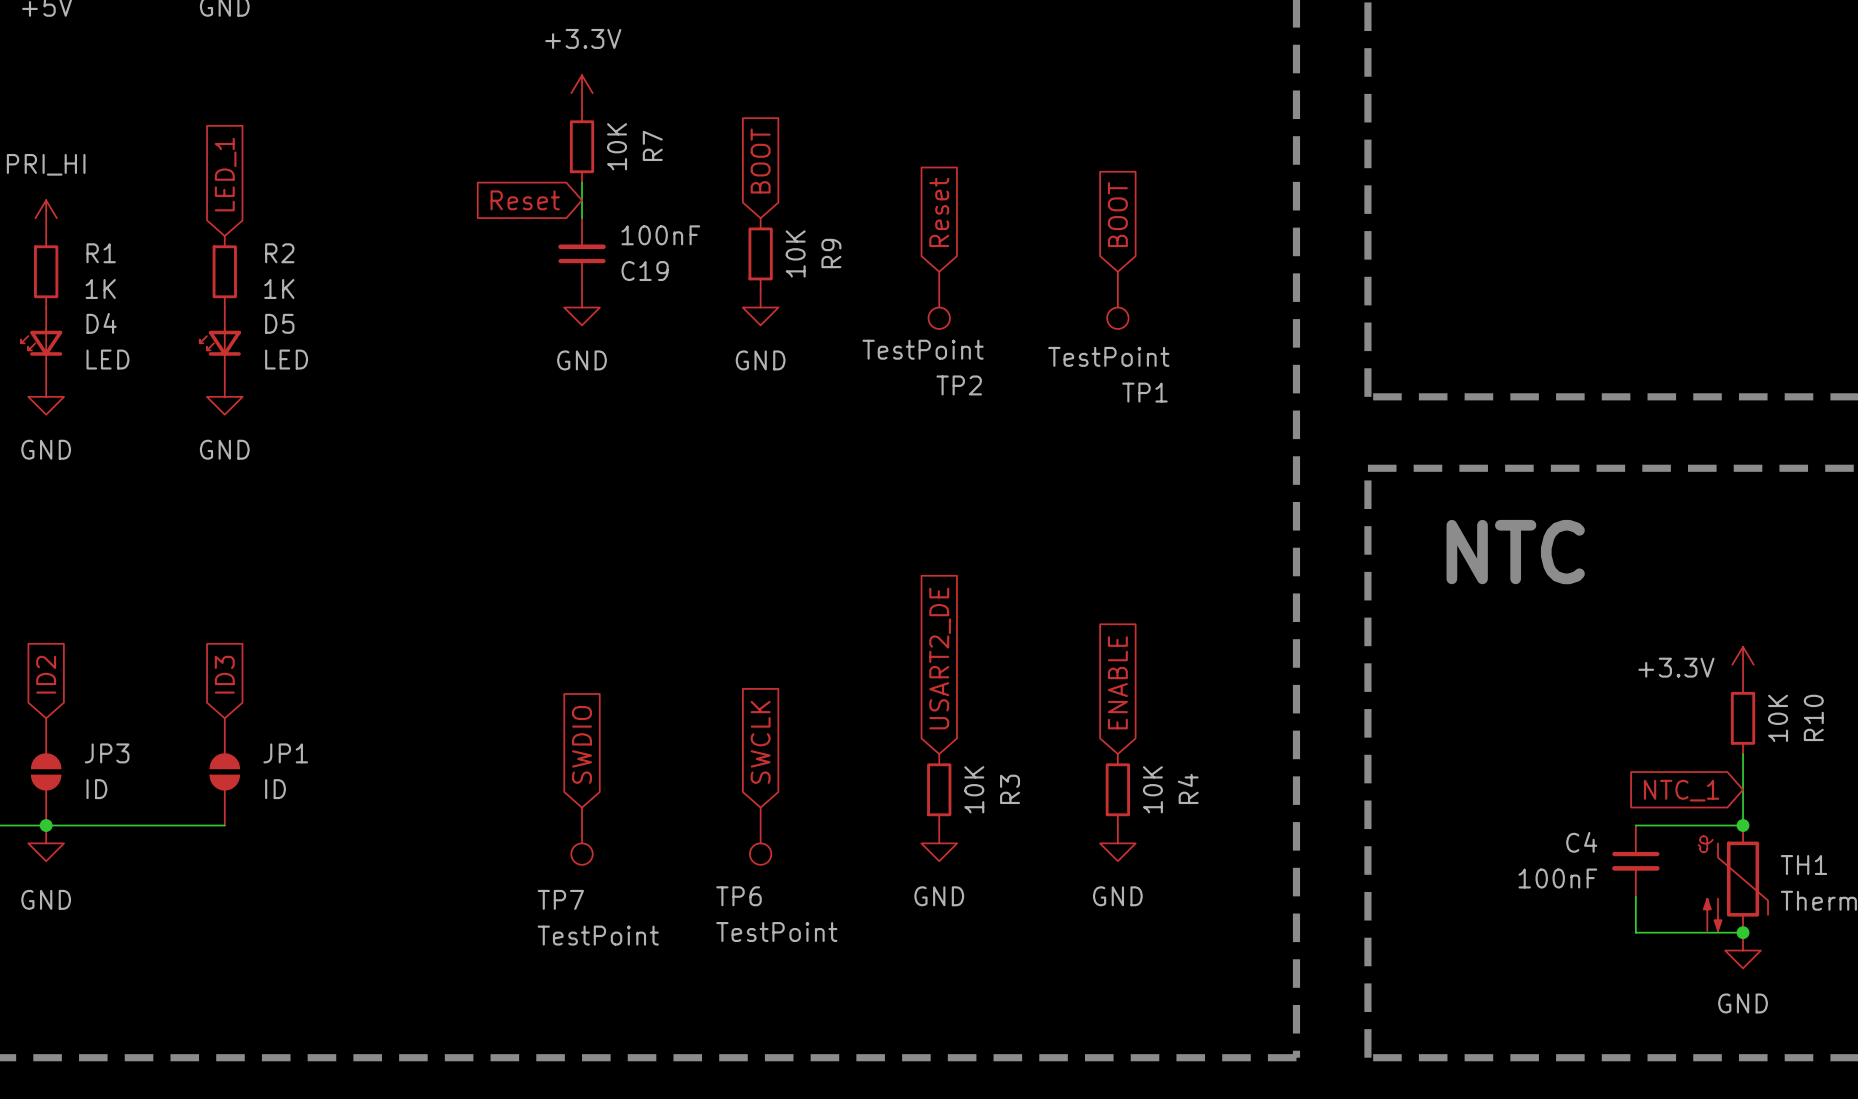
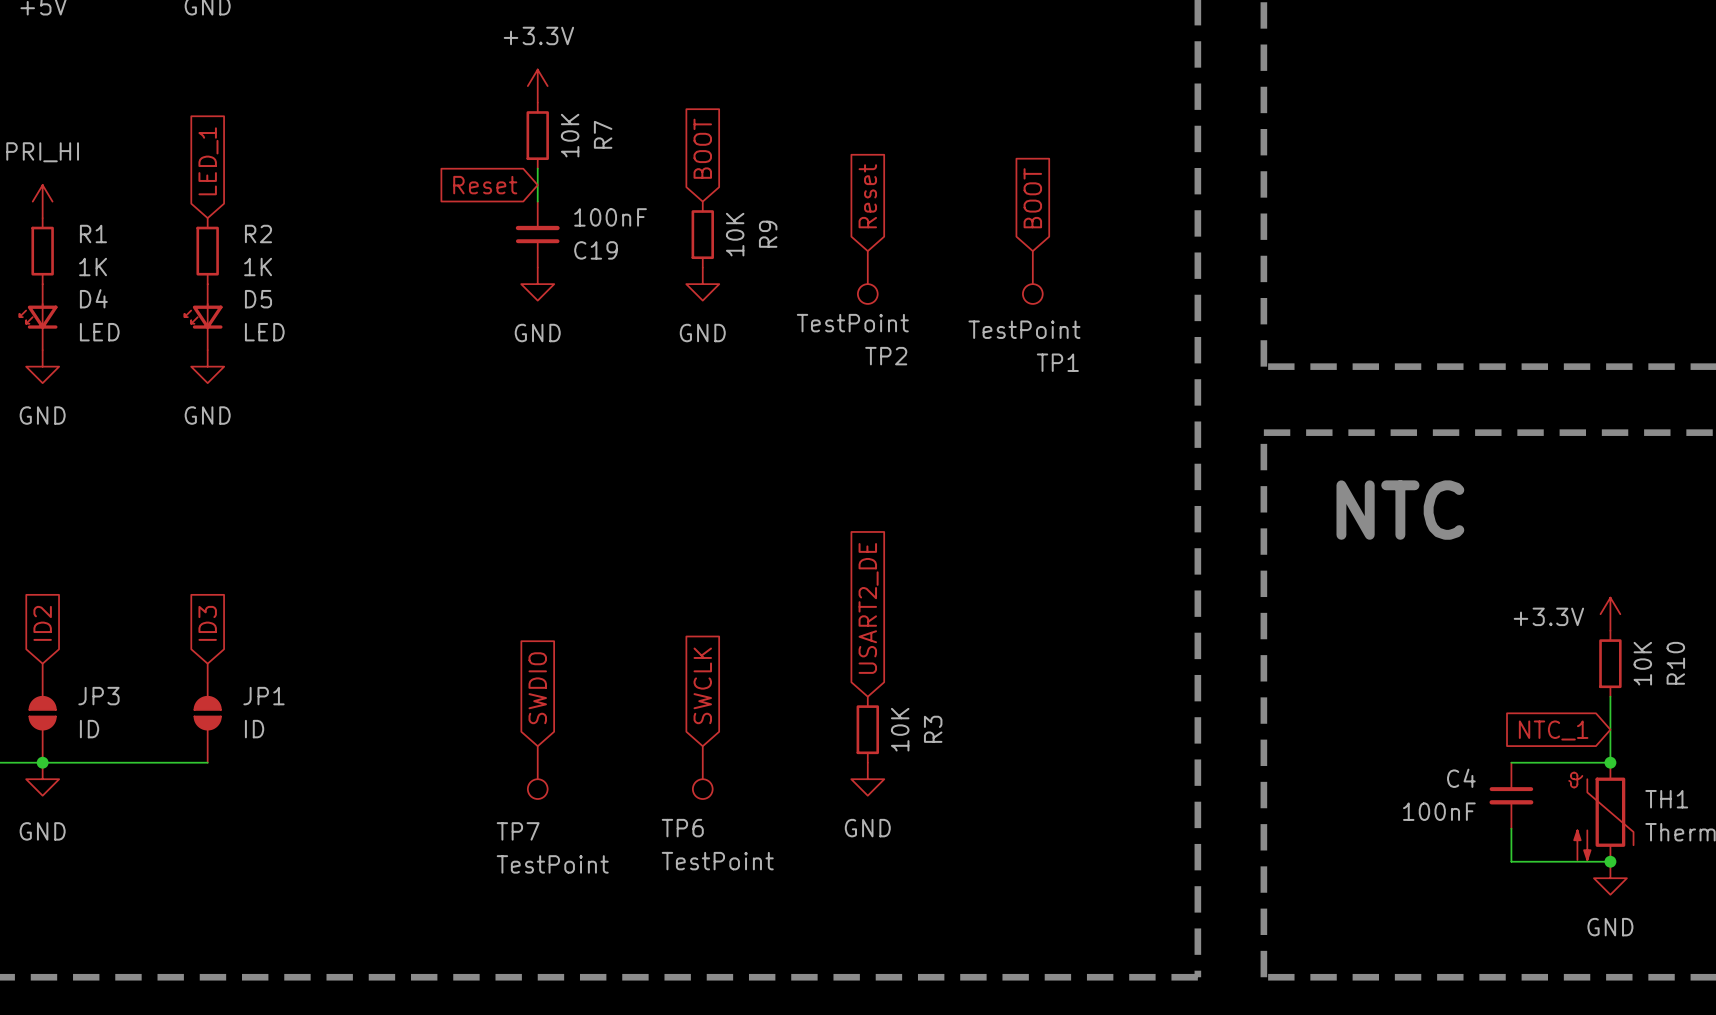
global label: ENABLE (1117, 682) -> none
R4: 10K (1117, 789) -> none
power symbol: GND (1117, 843) -> none

